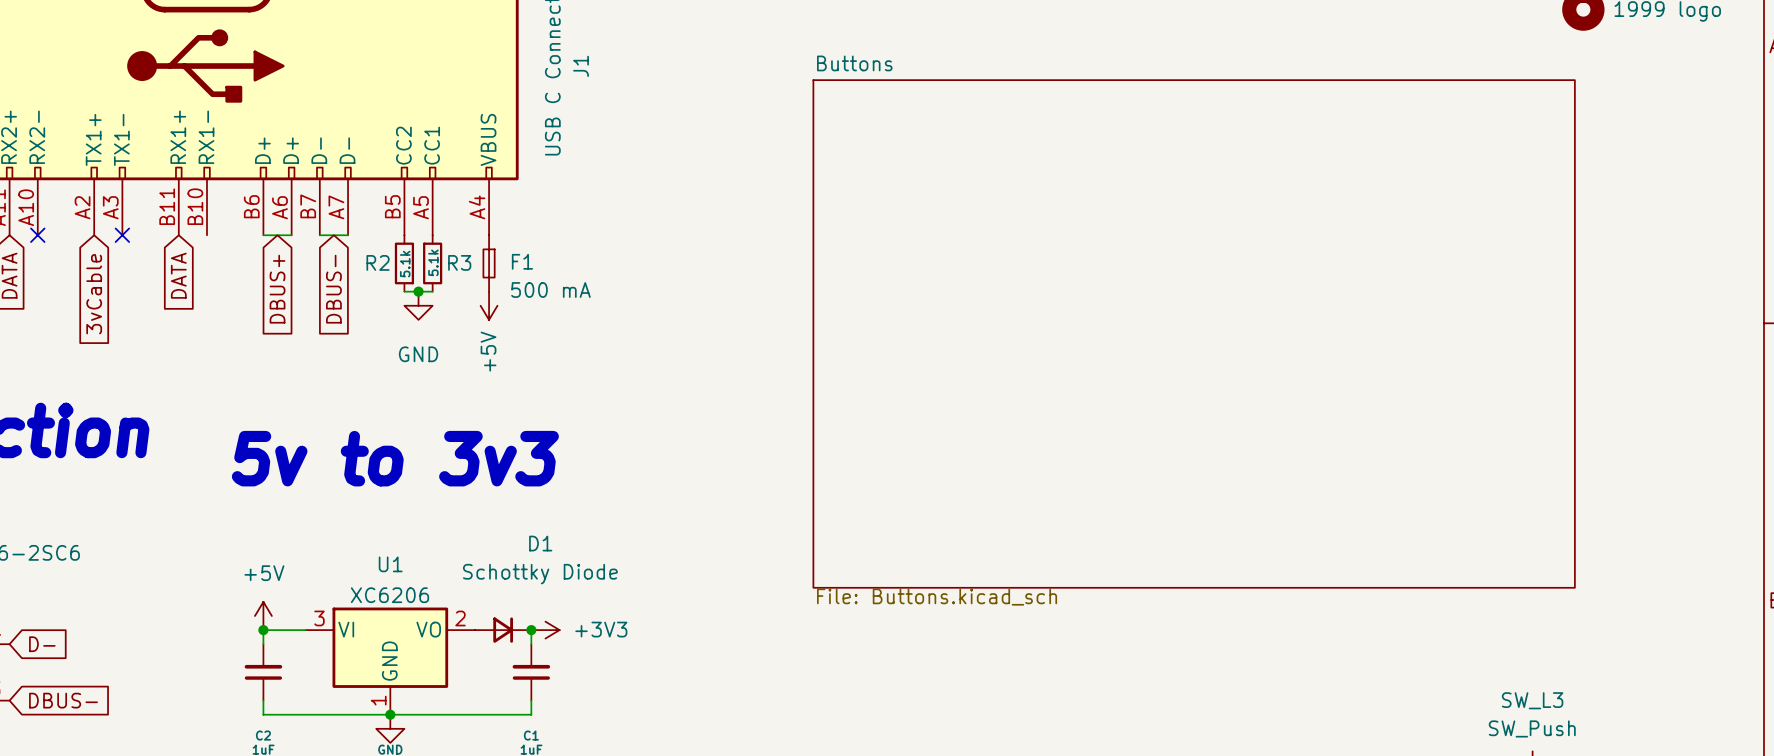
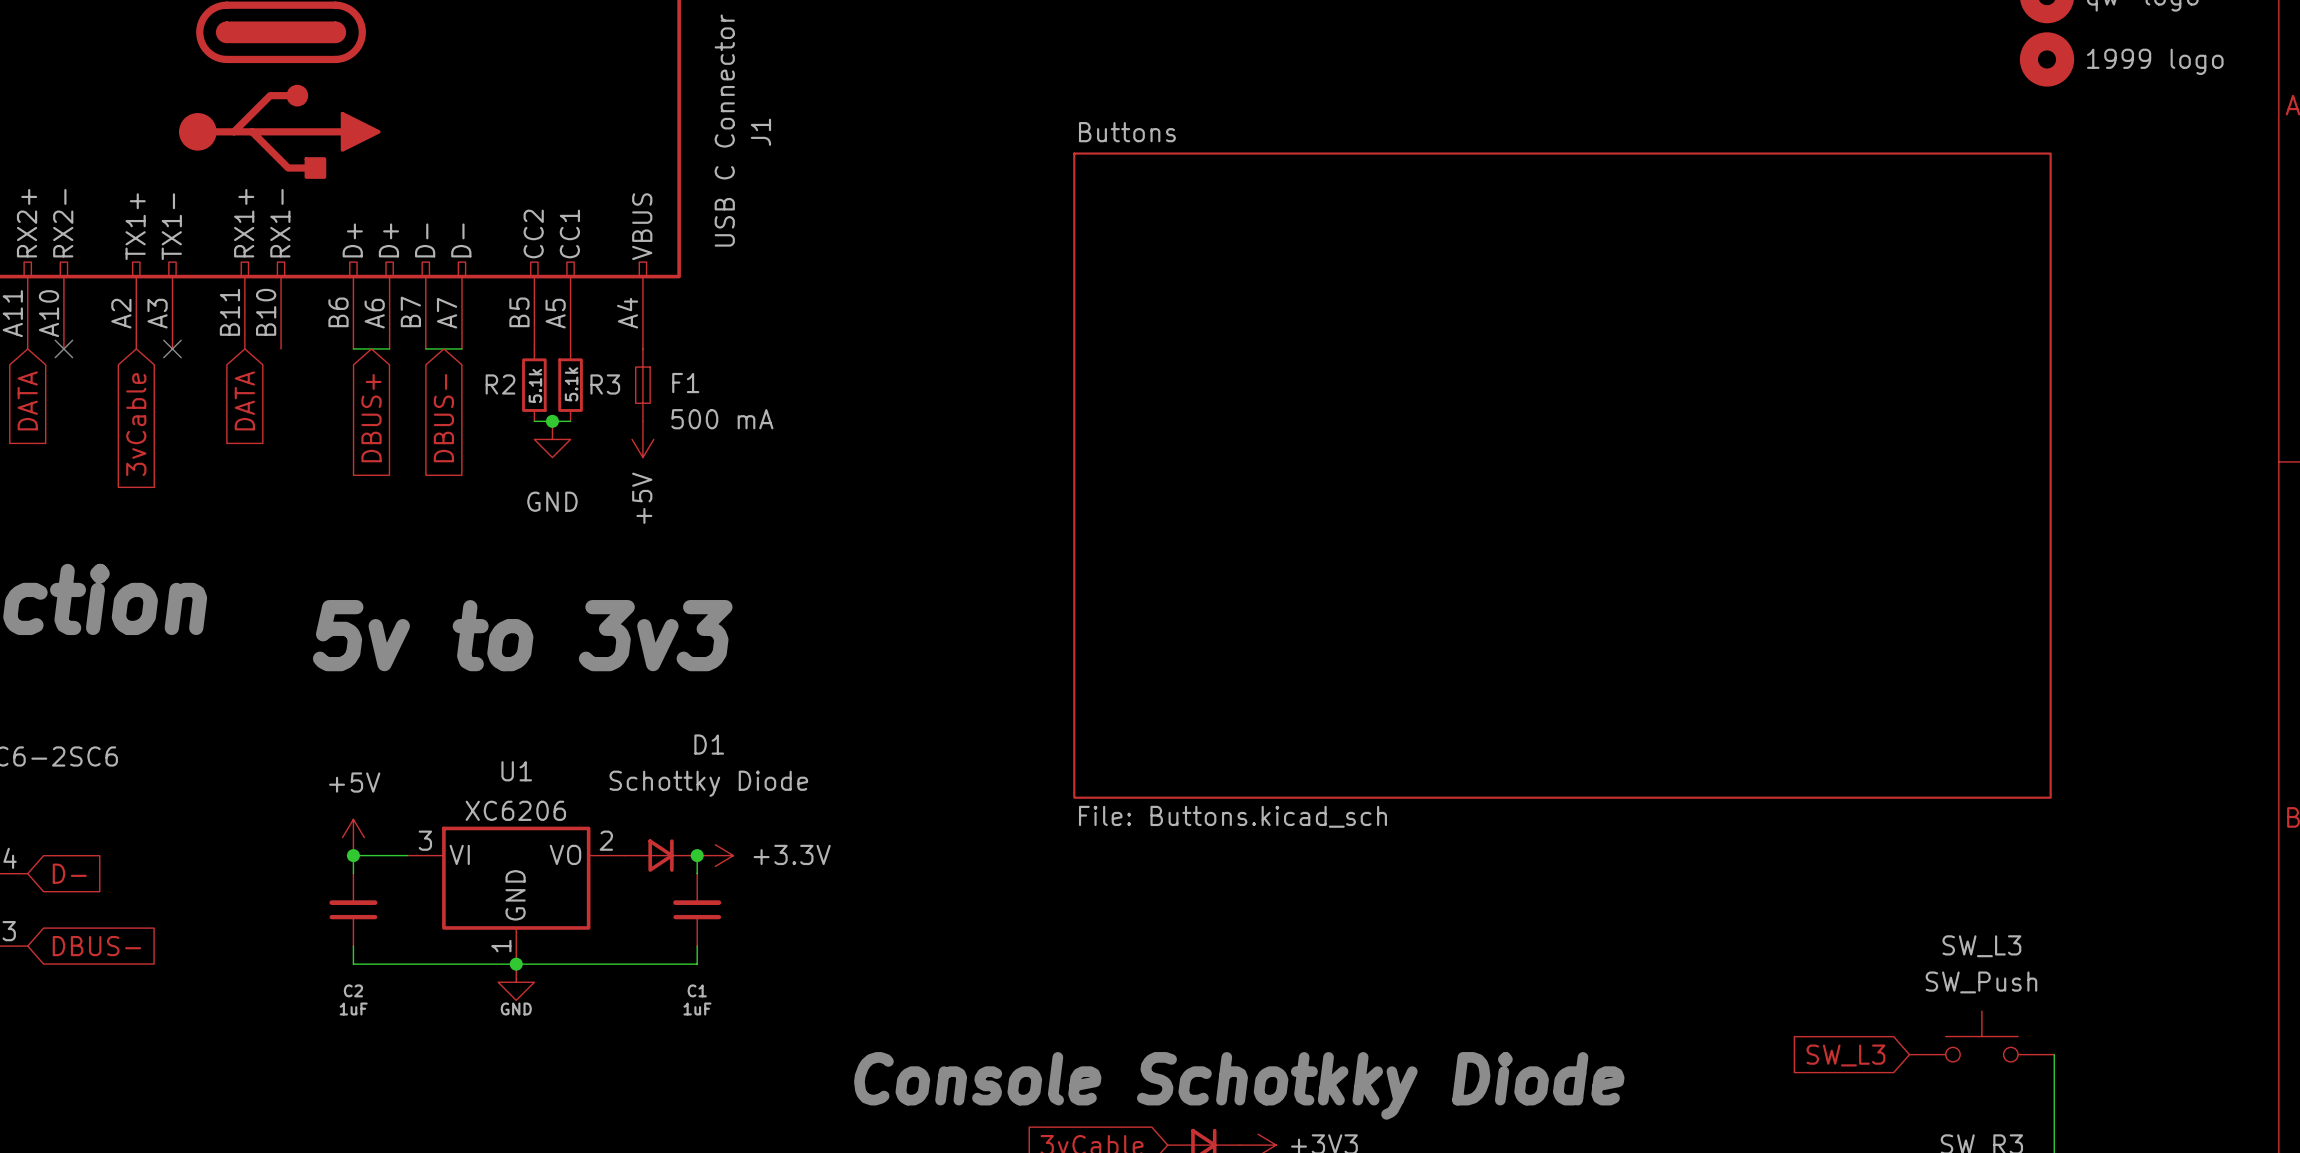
sheet Buttons: File: Buttons.kicad_sch (1194, 333) -> none
sheet Buttons: none -> File: Buttons.kicad_sch (1562, 475)
power symbol: +3V3 (545, 630) -> +3.3V (715, 855)

